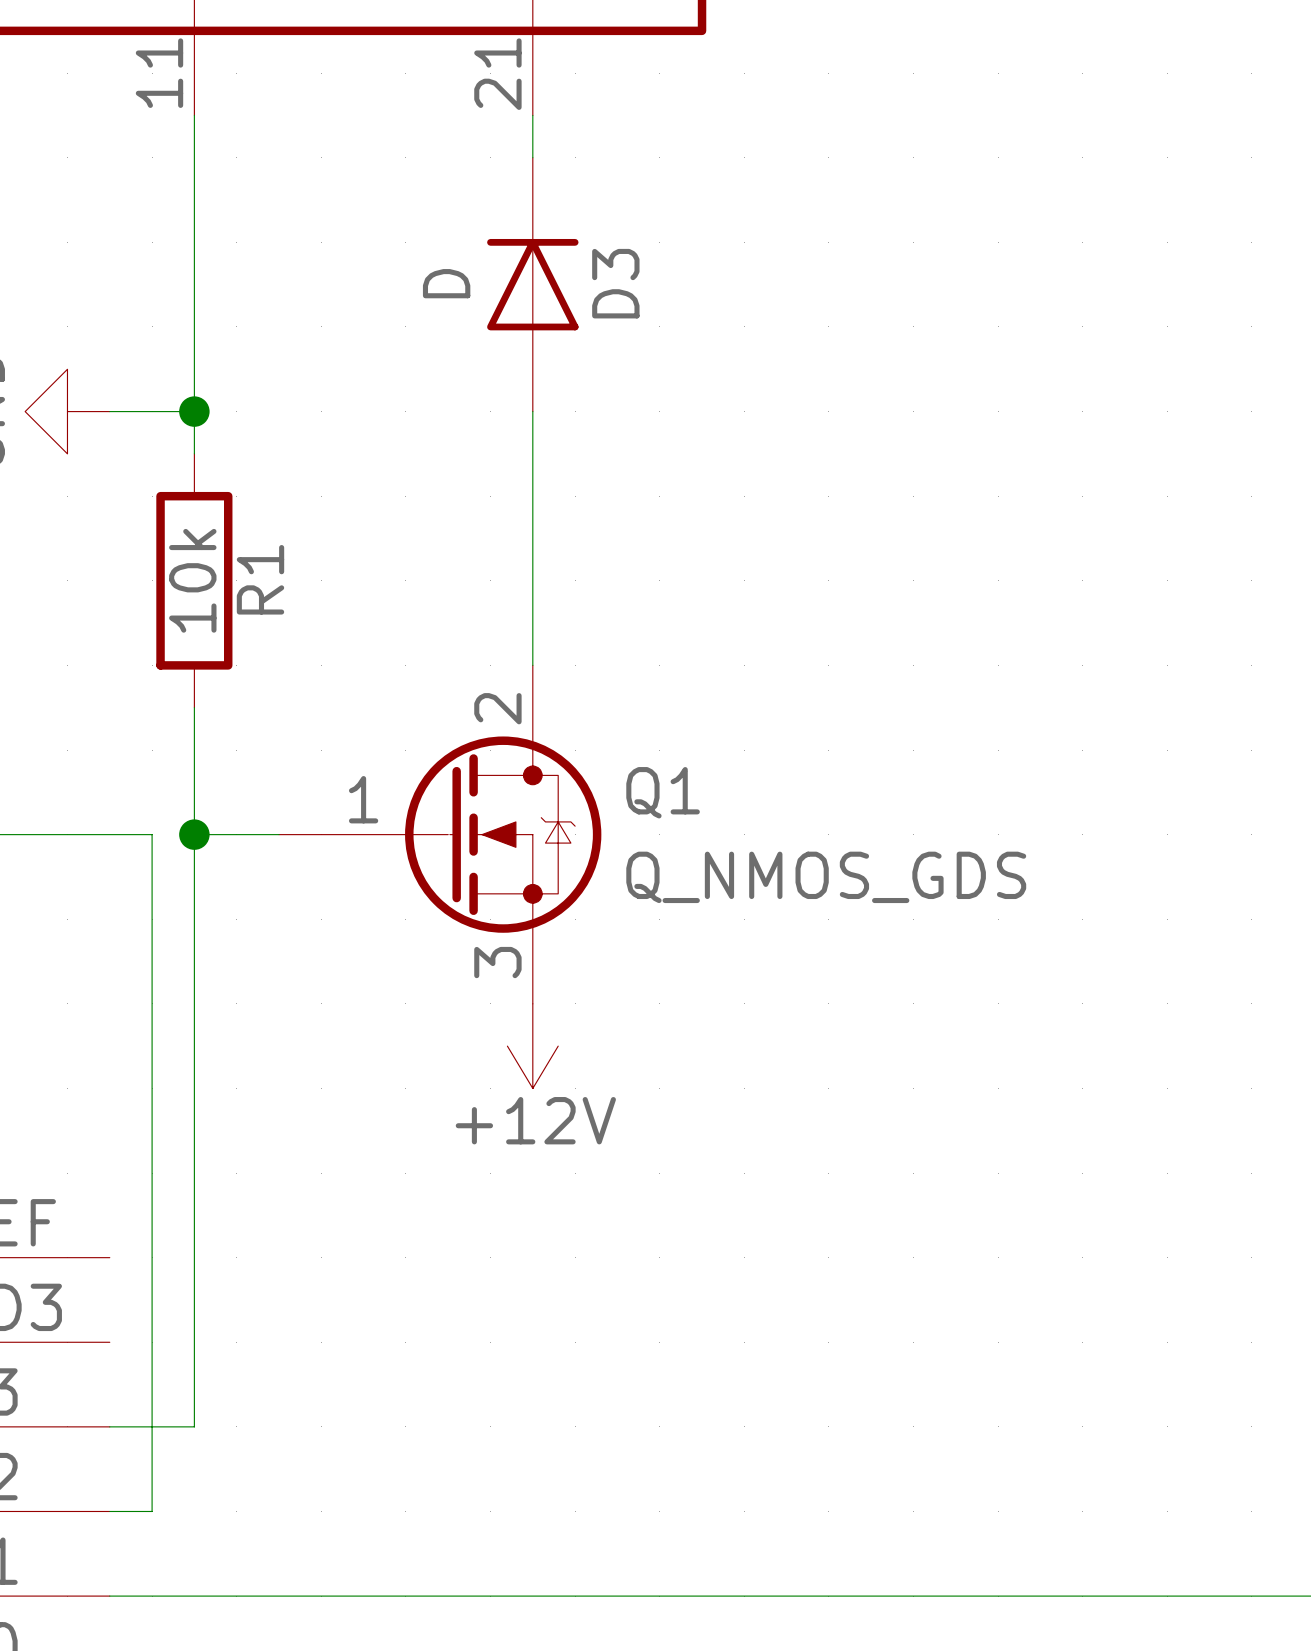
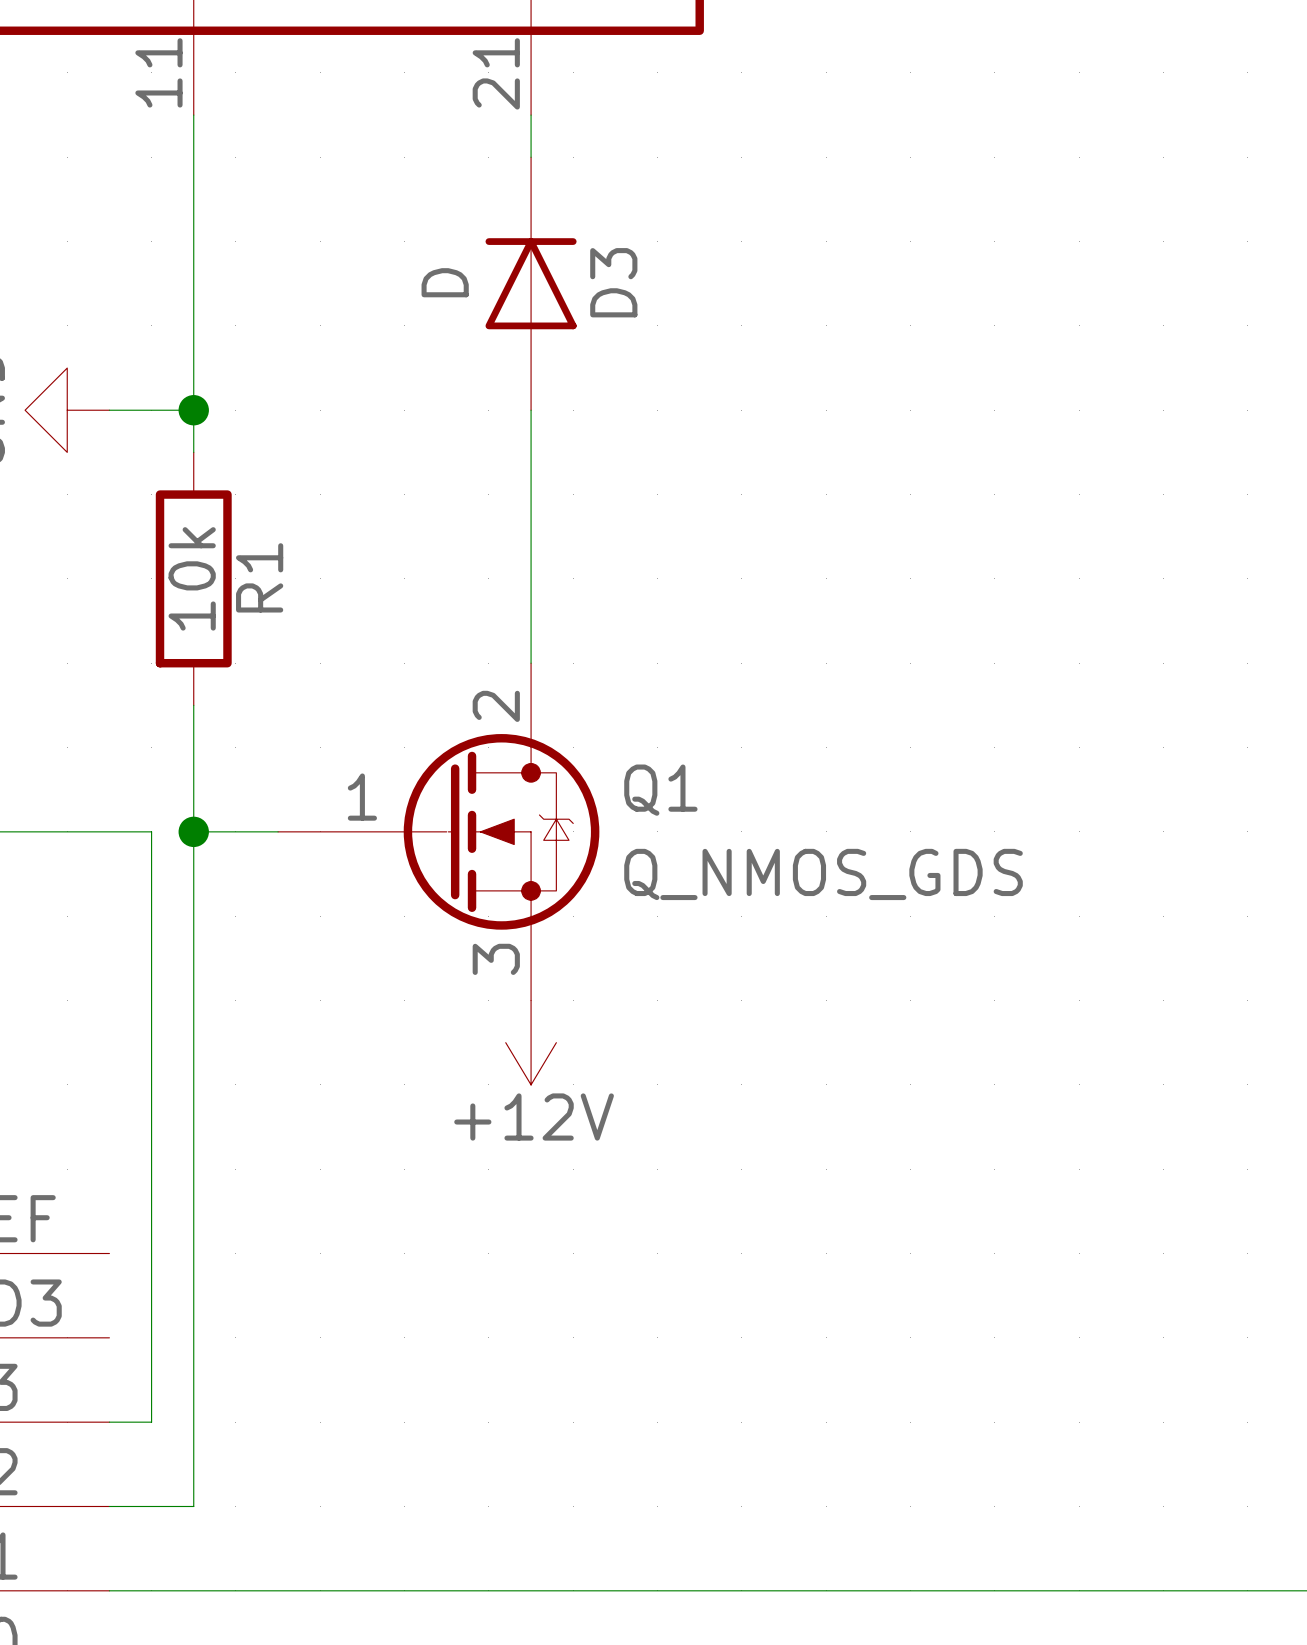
wire: (194, 1426) (152, 1426) (152, 1511) -> (193, 1422) (193, 1506) (151, 1506)

